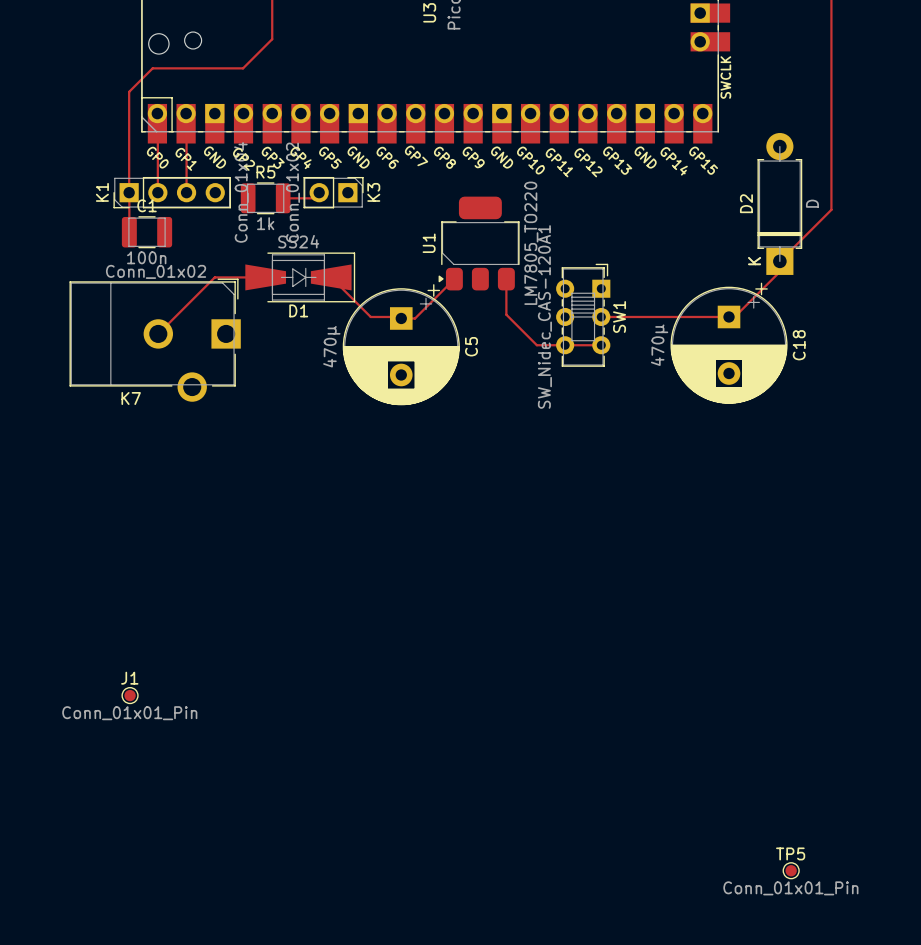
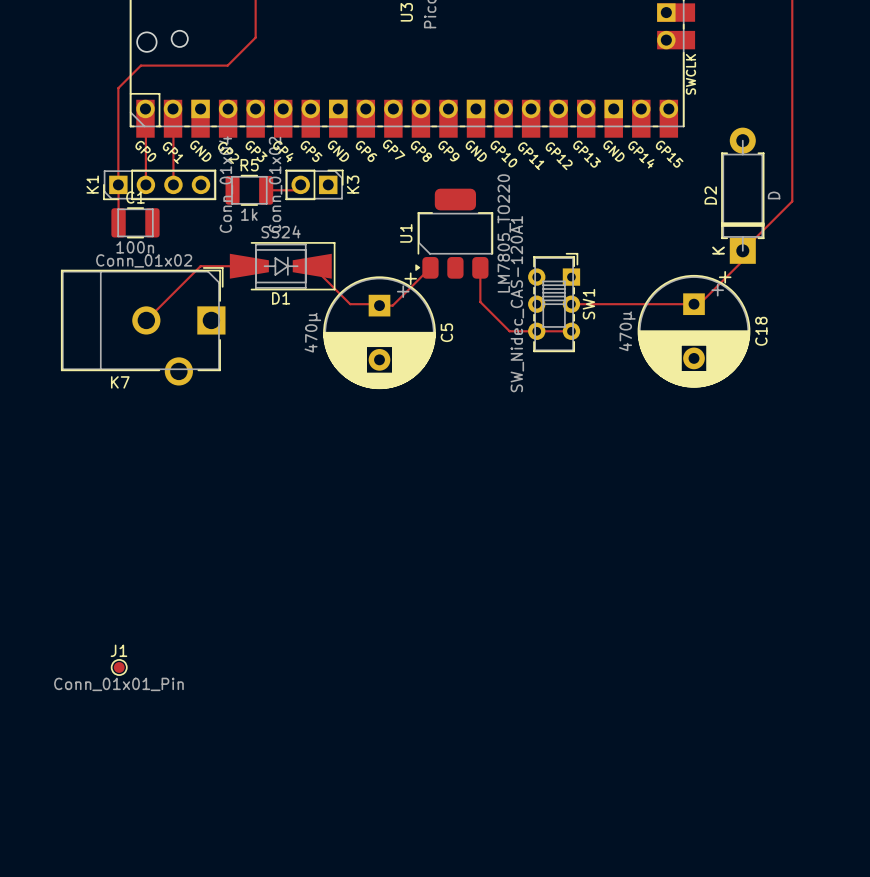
TP5: Conn_01x01_Pin (791, 870) -> none

